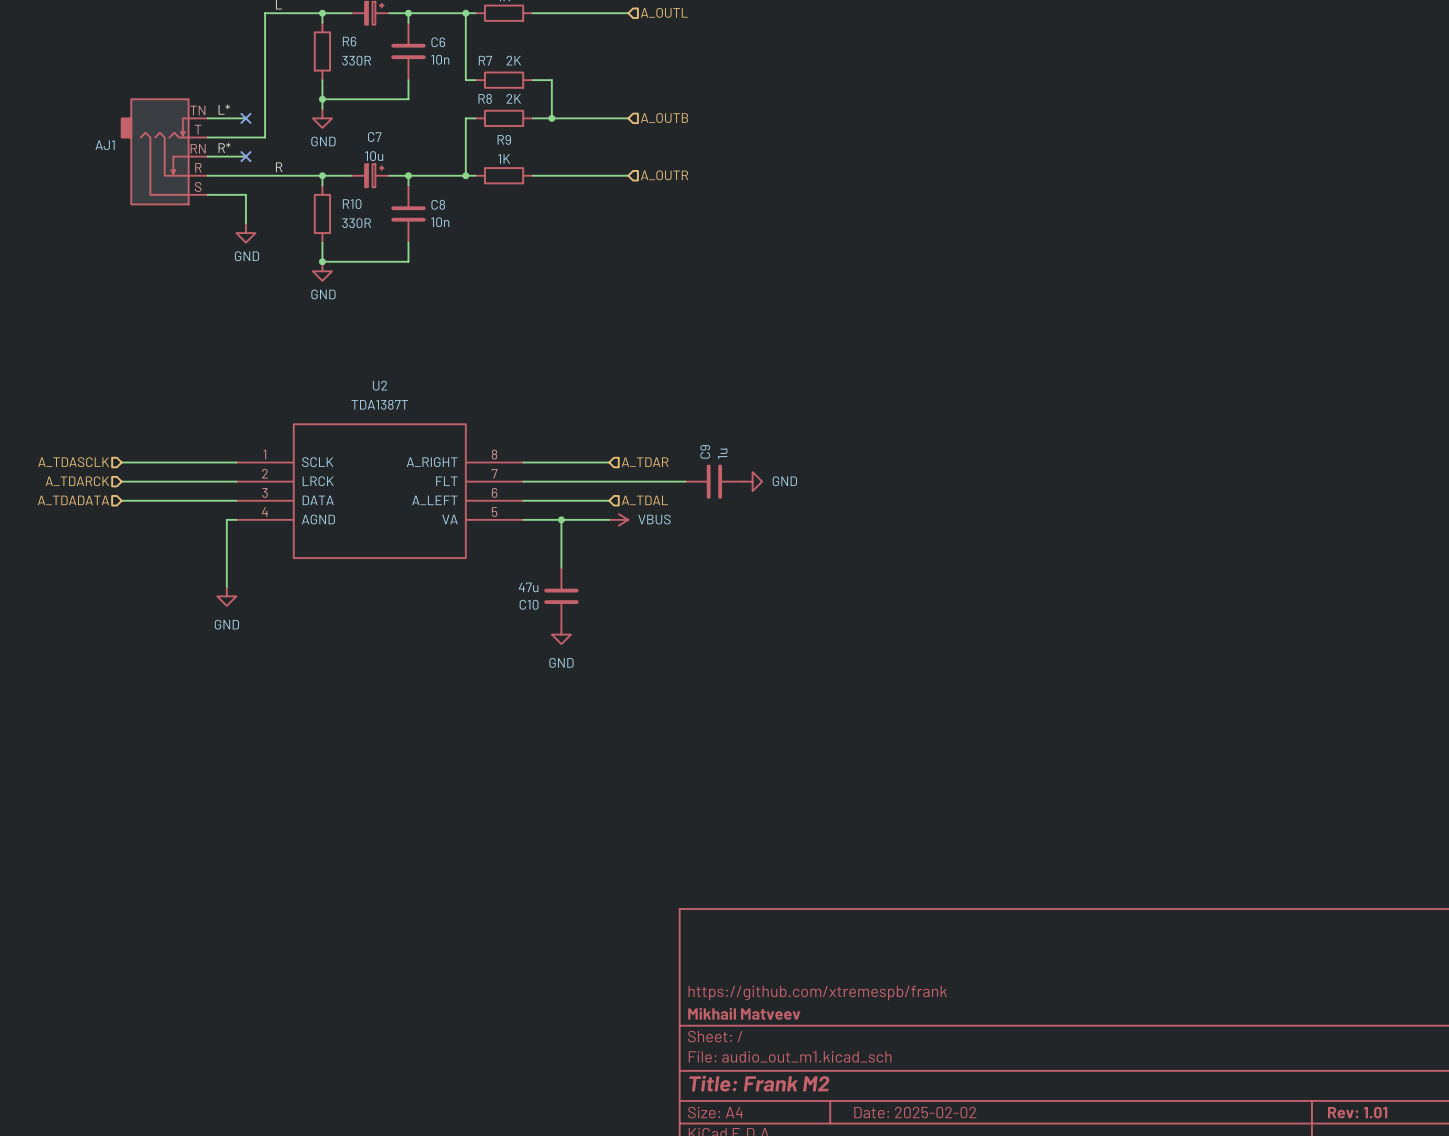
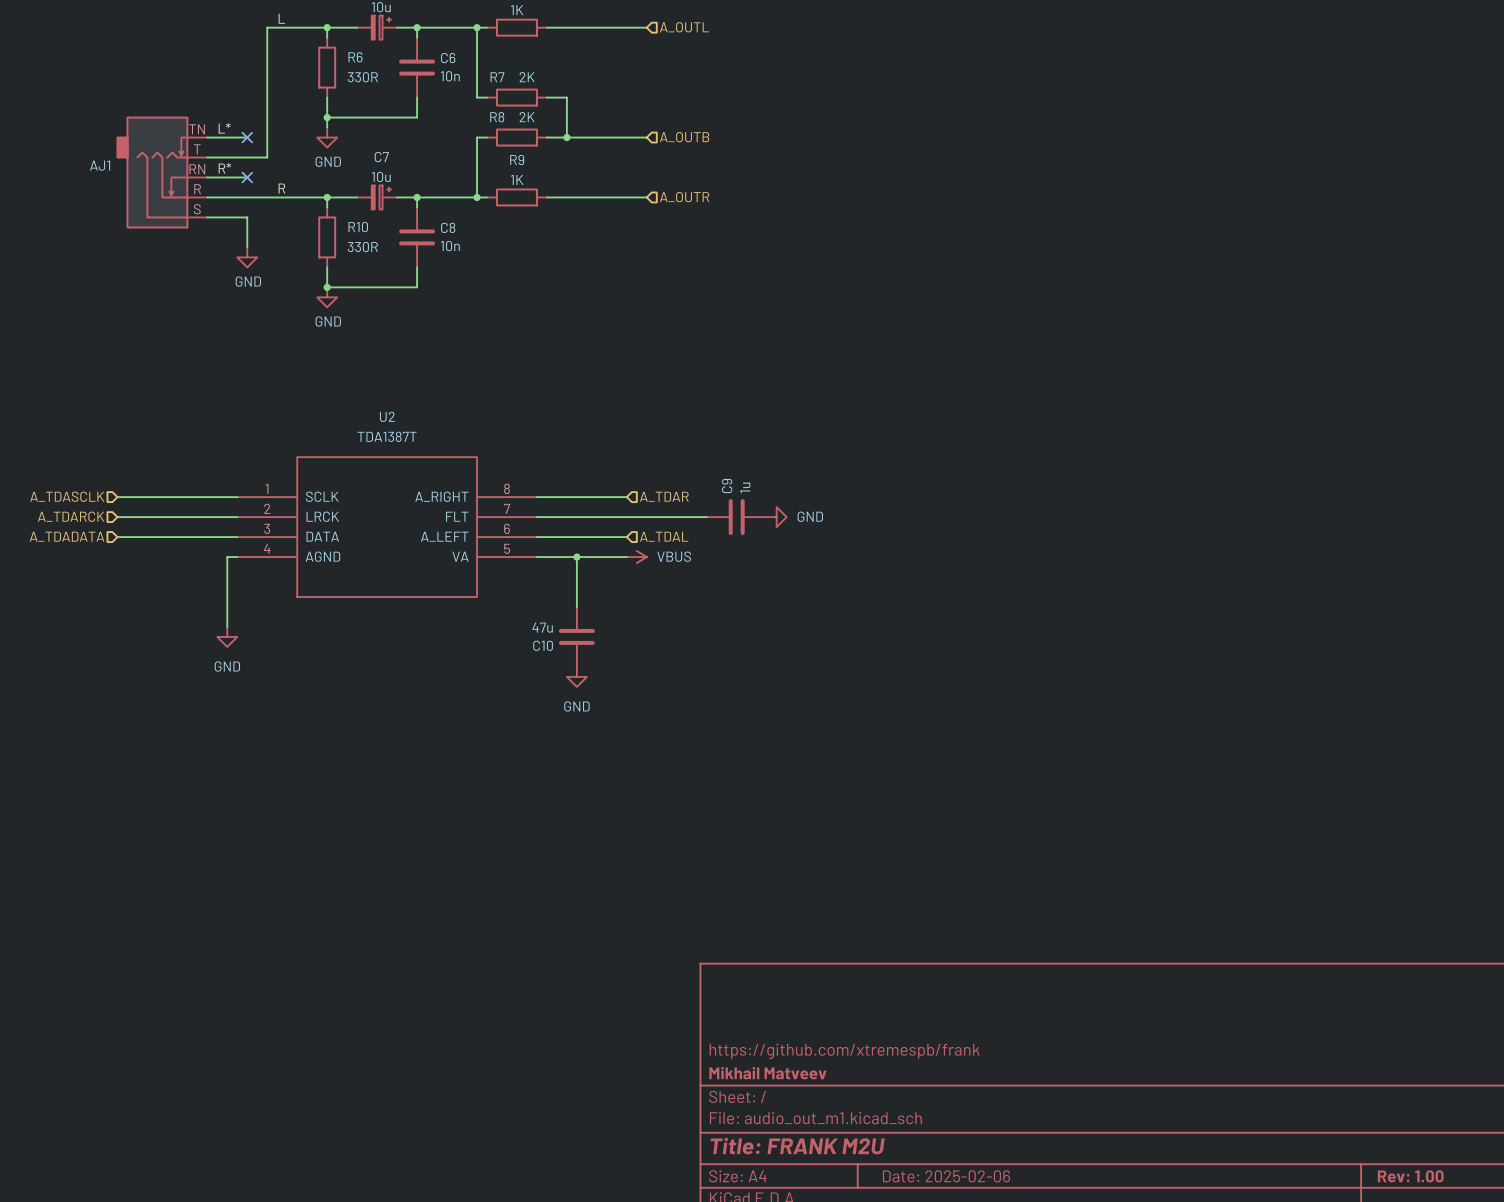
title block: Title: Frank M2 (759, 1083) -> Title: FRANK M2U (797, 1146)
title block: Date: 2025-02-02 (915, 1112) -> Date: 2025-02-06 (946, 1176)
title block: Rev: 1.01 (1357, 1112) -> Rev: 1.00 (1410, 1176)

